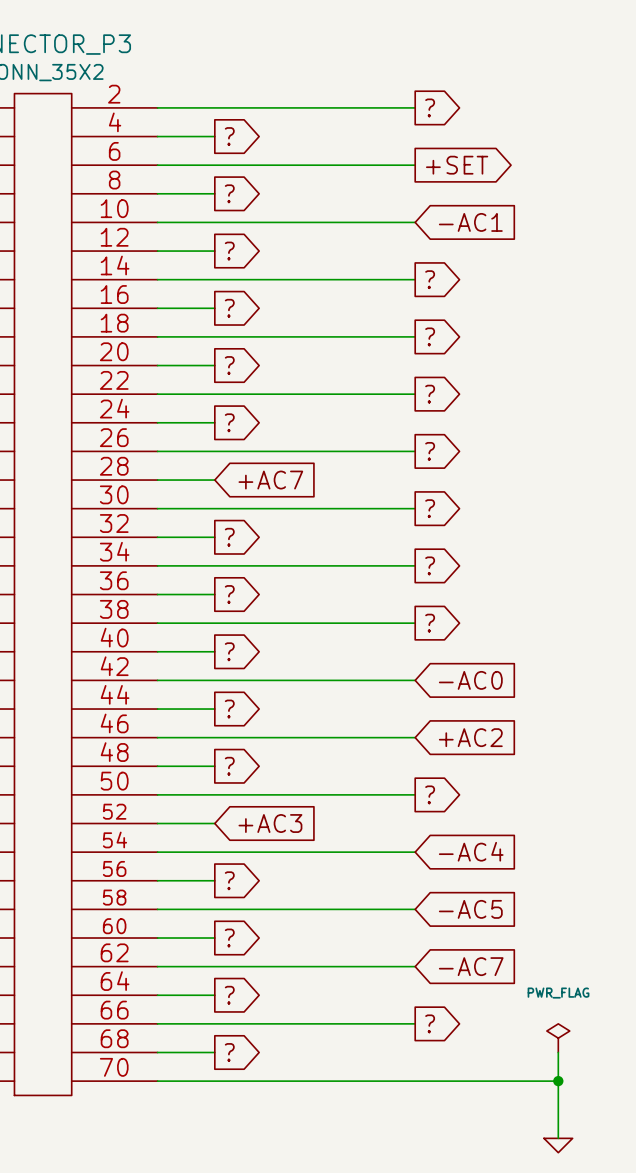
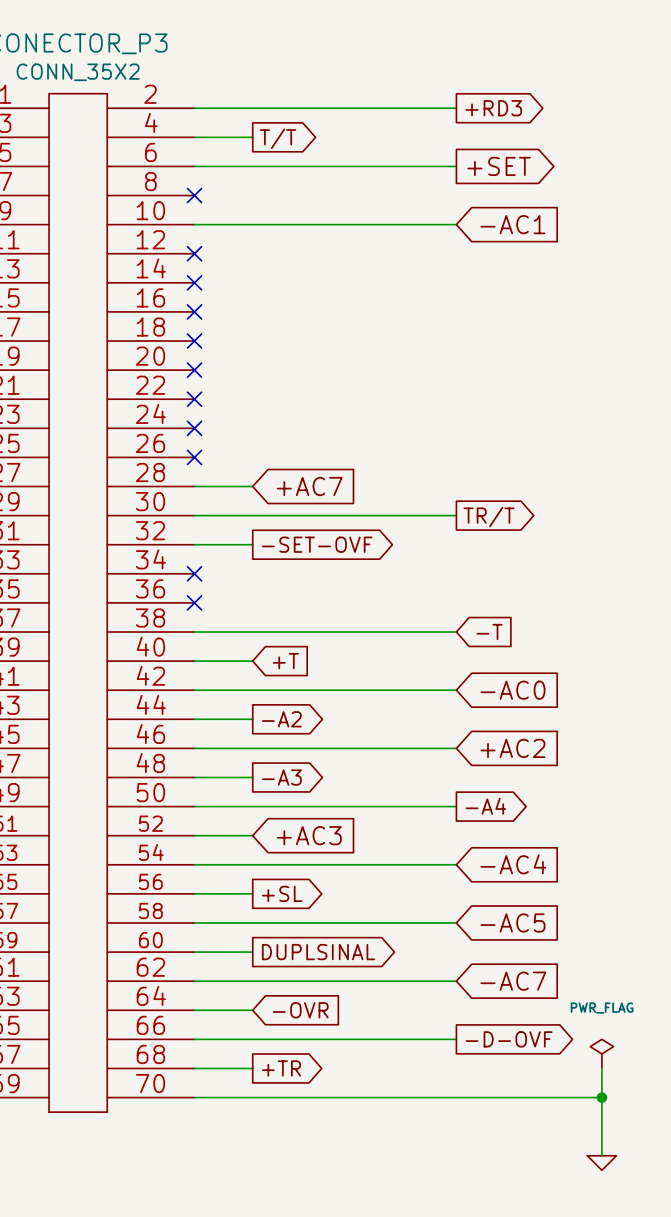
global label: ? (430, 107) -> +RD3 (493, 108)
global label: ? (229, 136) -> T/T (278, 138)
wire: (157, 193) (214, 193) -> none
no-connect mark: none -> (194, 195)
global label: ? (229, 193) -> none
wire: (157, 251) (214, 251) -> none
no-connect mark: none -> (194, 253)
global label: ? (229, 251) -> none
wire: (157, 279) (415, 279) -> none
no-connect mark: none -> (194, 282)
global label: ? (430, 279) -> none
wire: (157, 308) (214, 308) -> none
no-connect mark: none -> (194, 311)
global label: ? (229, 308) -> none
wire: (157, 336) (415, 336) -> none
no-connect mark: none -> (194, 341)
global label: ? (430, 336) -> none
wire: (157, 365) (214, 365) -> none
no-connect mark: none -> (194, 370)
global label: ? (229, 365) -> none
wire: (157, 394) (415, 394) -> none
no-connect mark: none -> (194, 399)
global label: ? (430, 394) -> none
wire: (157, 422) (214, 422) -> none
no-connect mark: none -> (194, 428)
global label: ? (229, 422) -> none
wire: (157, 451) (415, 451) -> none
no-connect mark: none -> (194, 457)
global label: ? (430, 451) -> none
global label: ? (430, 508) -> TR/T (489, 516)
global label: ? (229, 537) -> -SET-OVF (317, 544)
wire: (157, 565) (415, 565) -> none
no-connect mark: none -> (194, 573)
global label: ? (430, 565) -> none
wire: (157, 594) (214, 594) -> none
no-connect mark: none -> (194, 602)
global label: ? (229, 594) -> none
global label shape: output (430, 623) -> input (489, 632)
global label: ? (430, 623) -> -T (489, 632)
global label shape: output (229, 651) -> input (285, 661)
global label: ? (229, 651) -> +T (285, 661)
global label: ? (229, 709) -> -A2 (281, 719)
global label: ? (229, 766) -> -A3 (281, 777)
global label: ? (430, 794) -> -A4 (485, 806)
global label: ? (229, 880) -> +SL (282, 893)
global label: ? (229, 938) -> DUPLSINAL (318, 952)
global label shape: output (229, 995) -> input (300, 1010)
global label: ? (229, 995) -> -OVR (300, 1010)
global label: ? (430, 1023) -> -D-OVF (509, 1039)
global label: ? (229, 1052) -> +TR (281, 1068)

